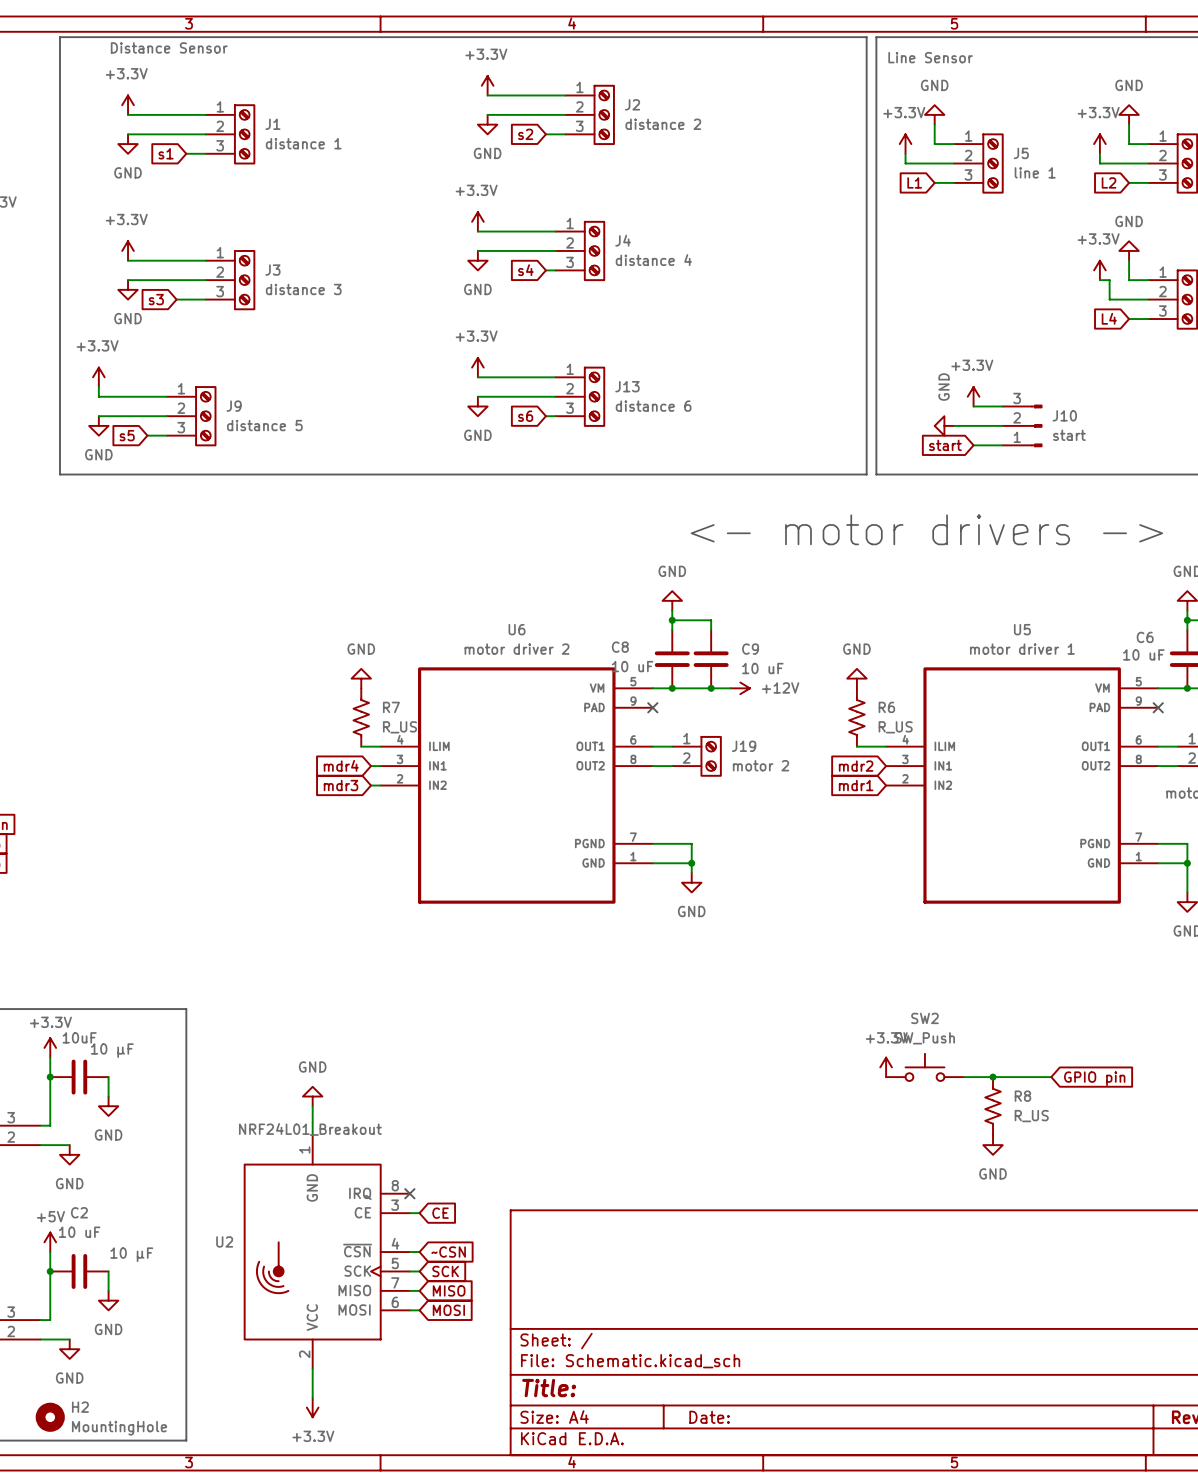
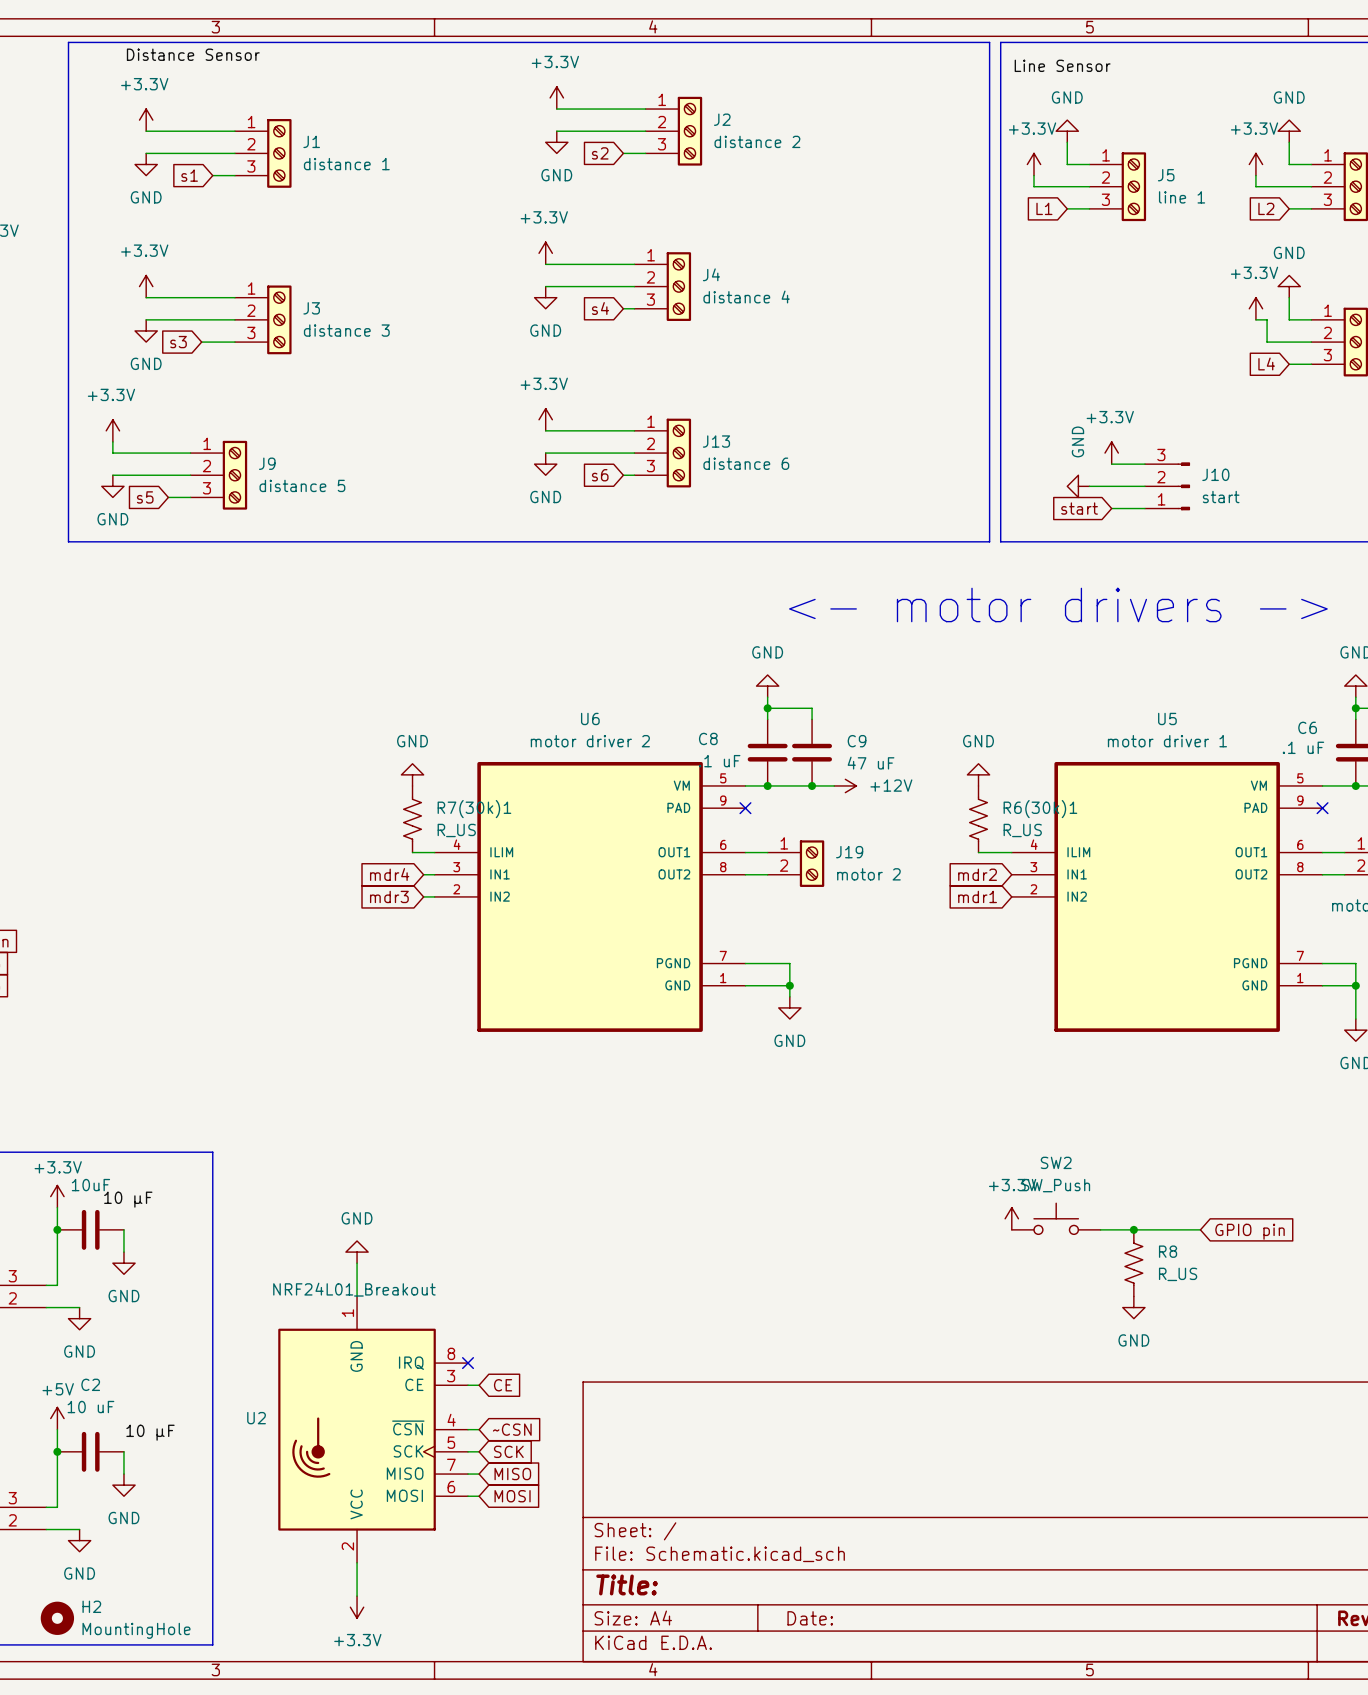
C6 value: 10 uF (1143, 654) -> .1 uF (1303, 747)
C8 value: 10 uF (632, 666) -> .1 uF (719, 761)
C9 value: 10 uF (762, 668) -> 47 uF (871, 763)
R7 name: R7 (391, 707) -> R7(30k)1 (474, 809)
R6 name: R6 (886, 707) -> R6(30k)1 (1040, 809)

